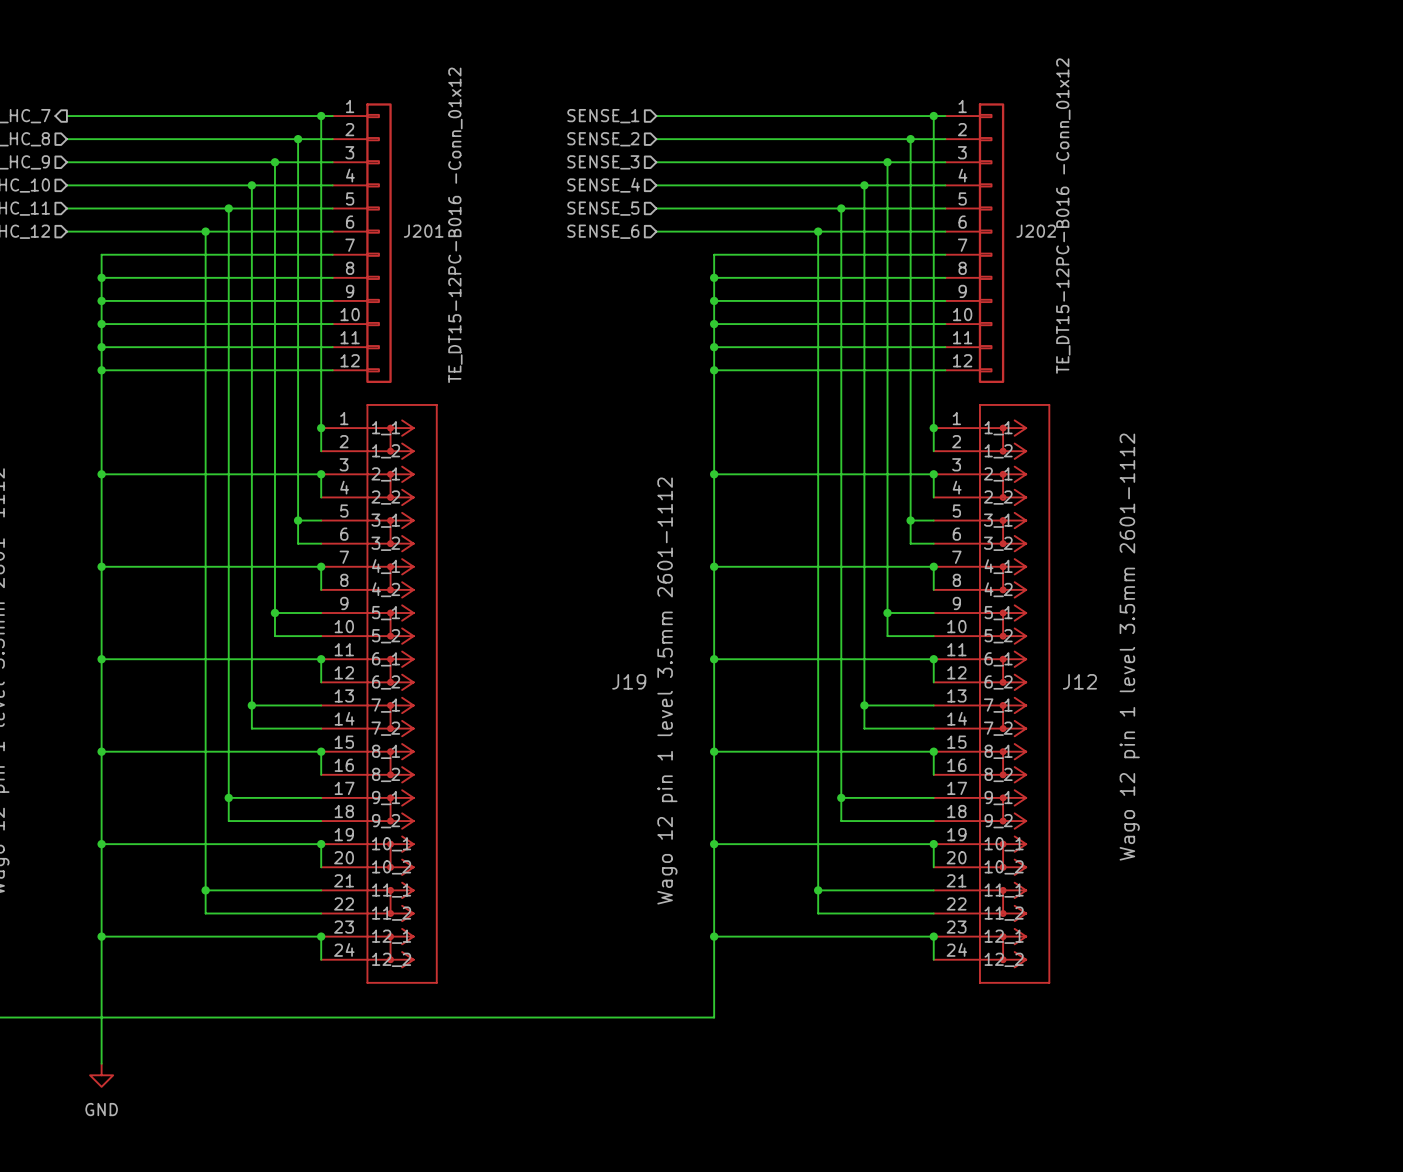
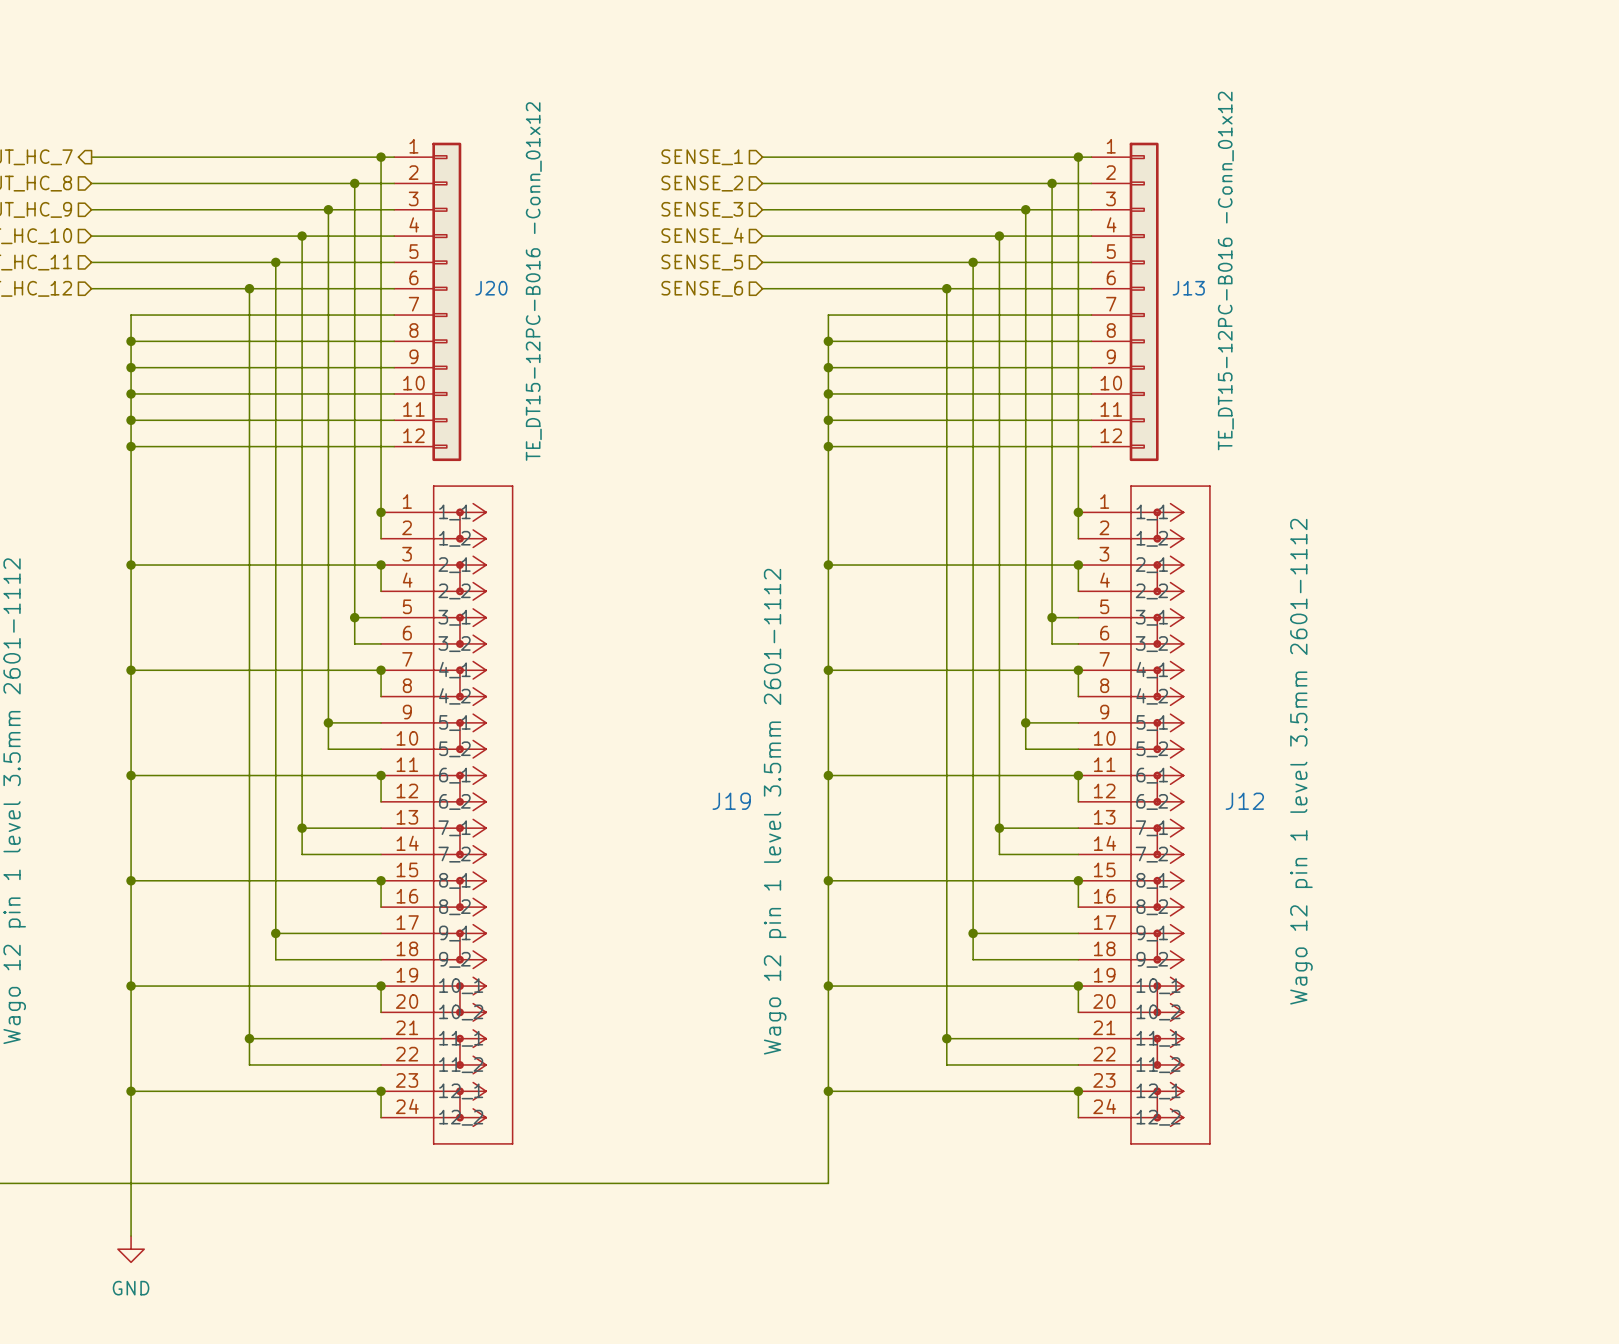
J201 name: J201 (423, 231) -> J20 (491, 288)
J202 name: J202 (1036, 231) -> J13 (1188, 288)

